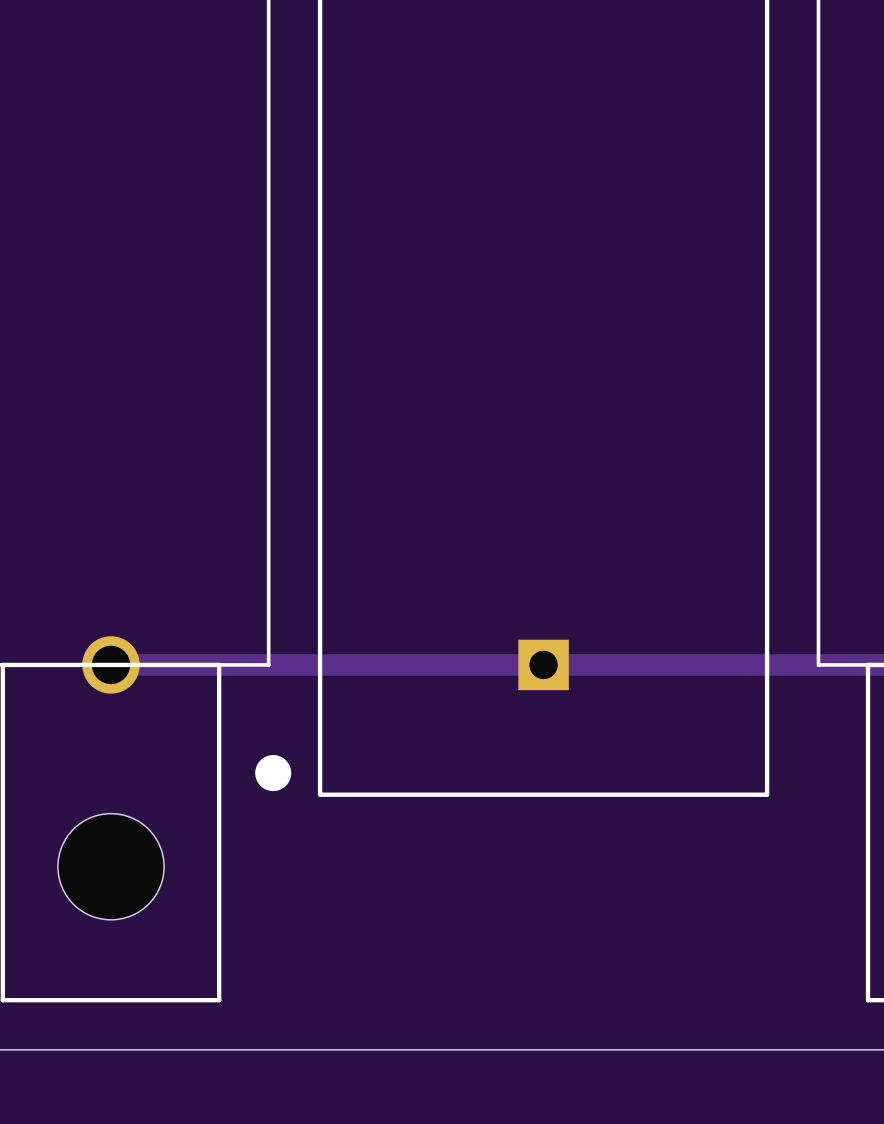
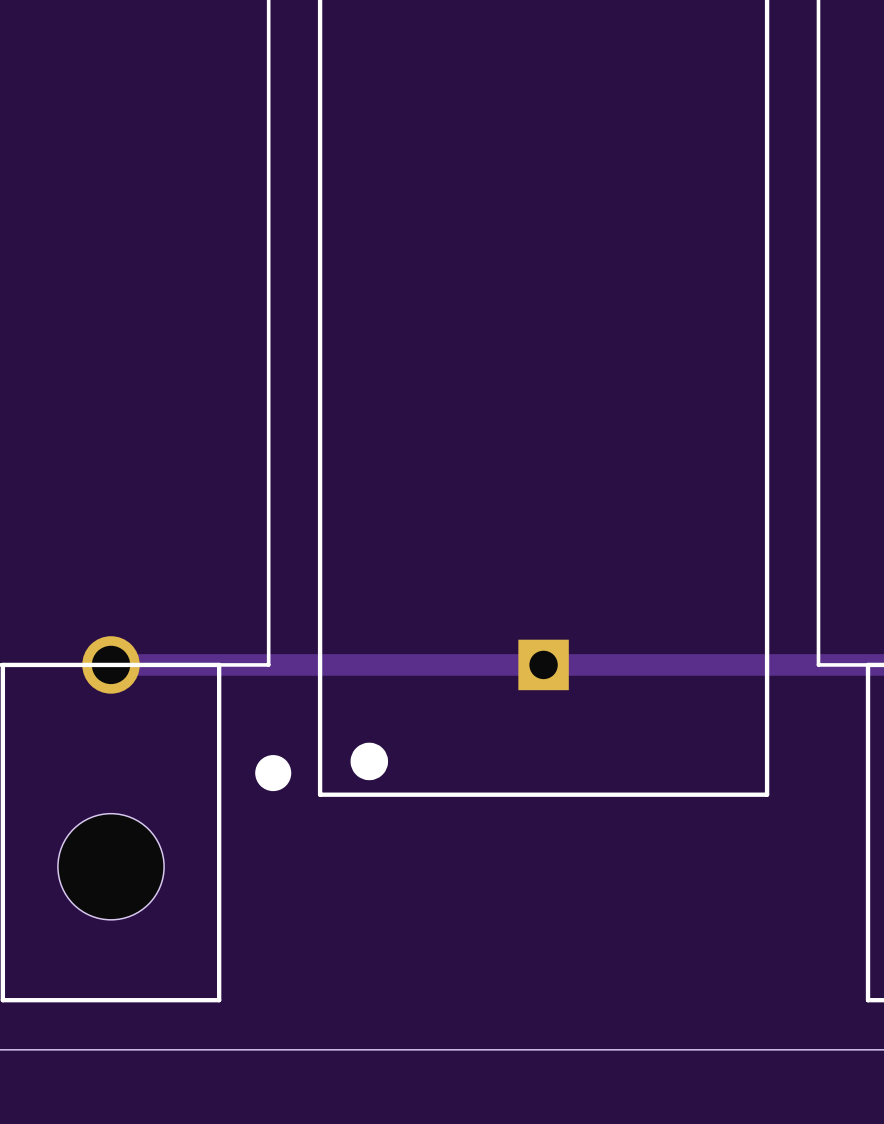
drawing: none -> [350, 742, 389, 781]

